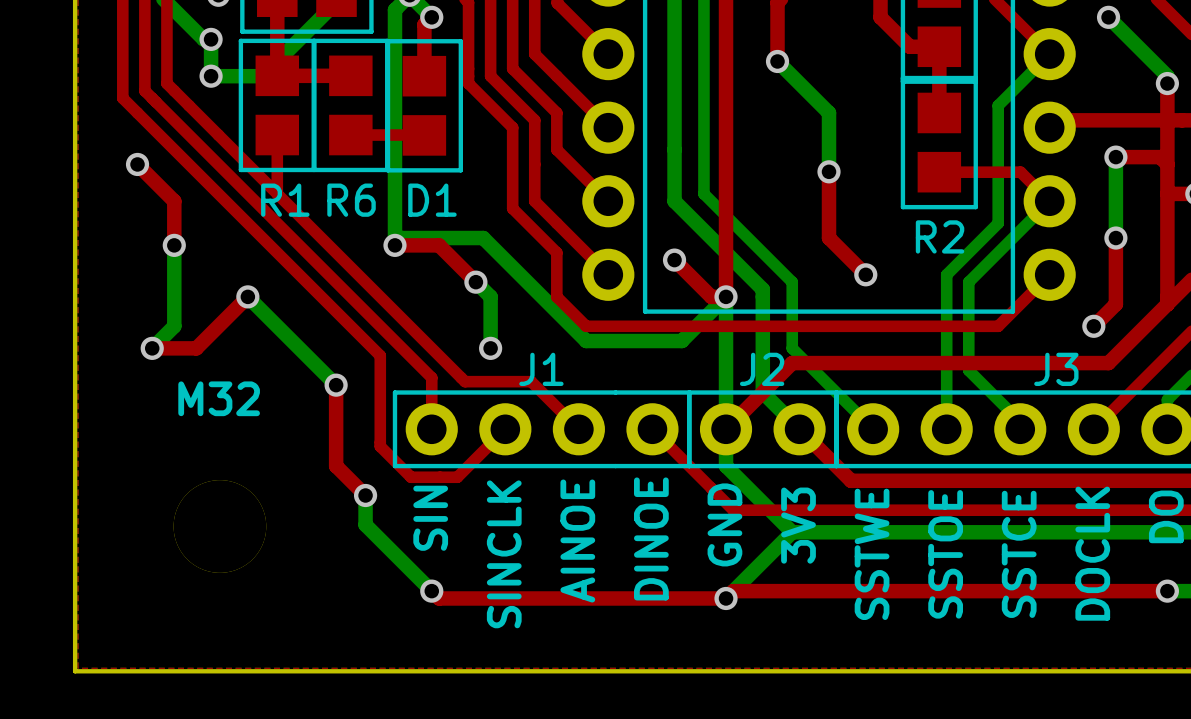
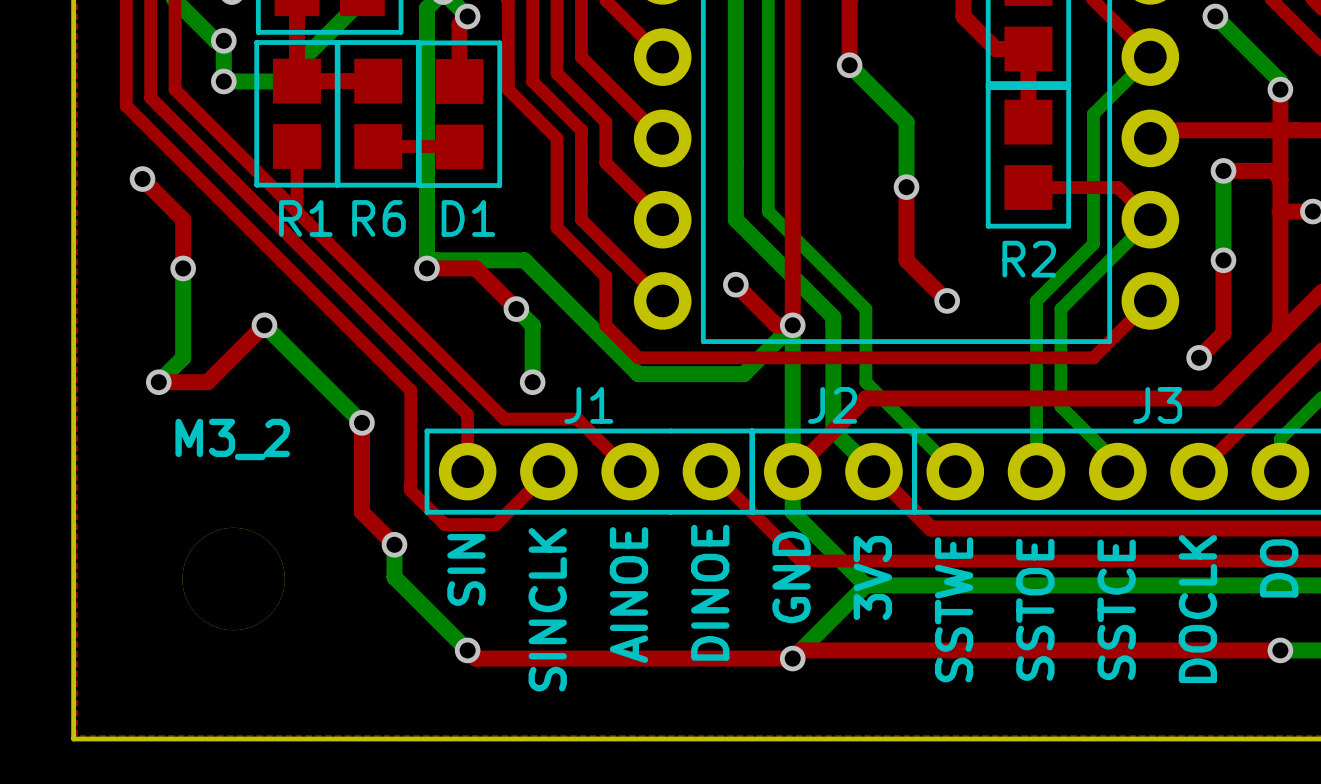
M32 name: M32 (219, 398) -> M3_2 (232, 439)

